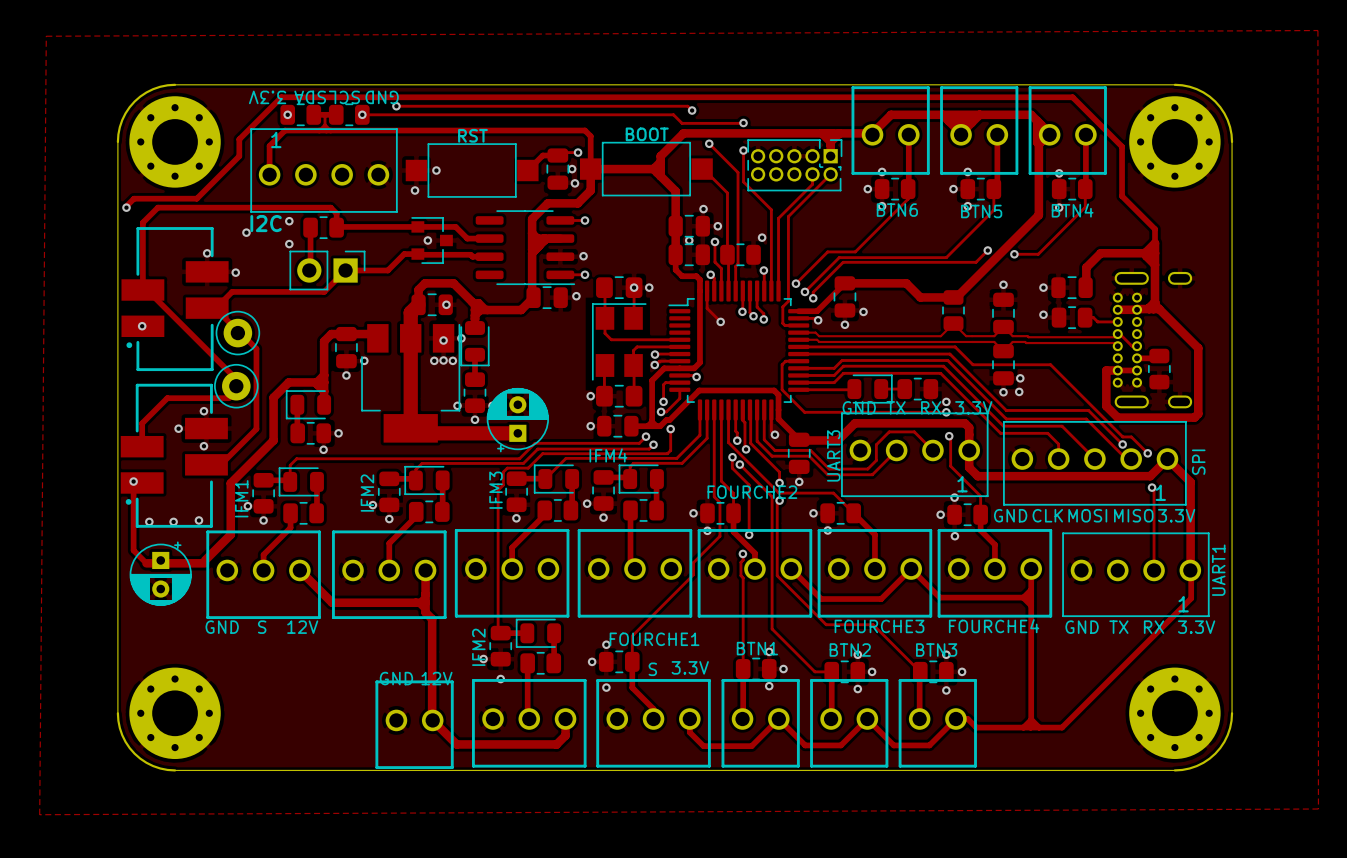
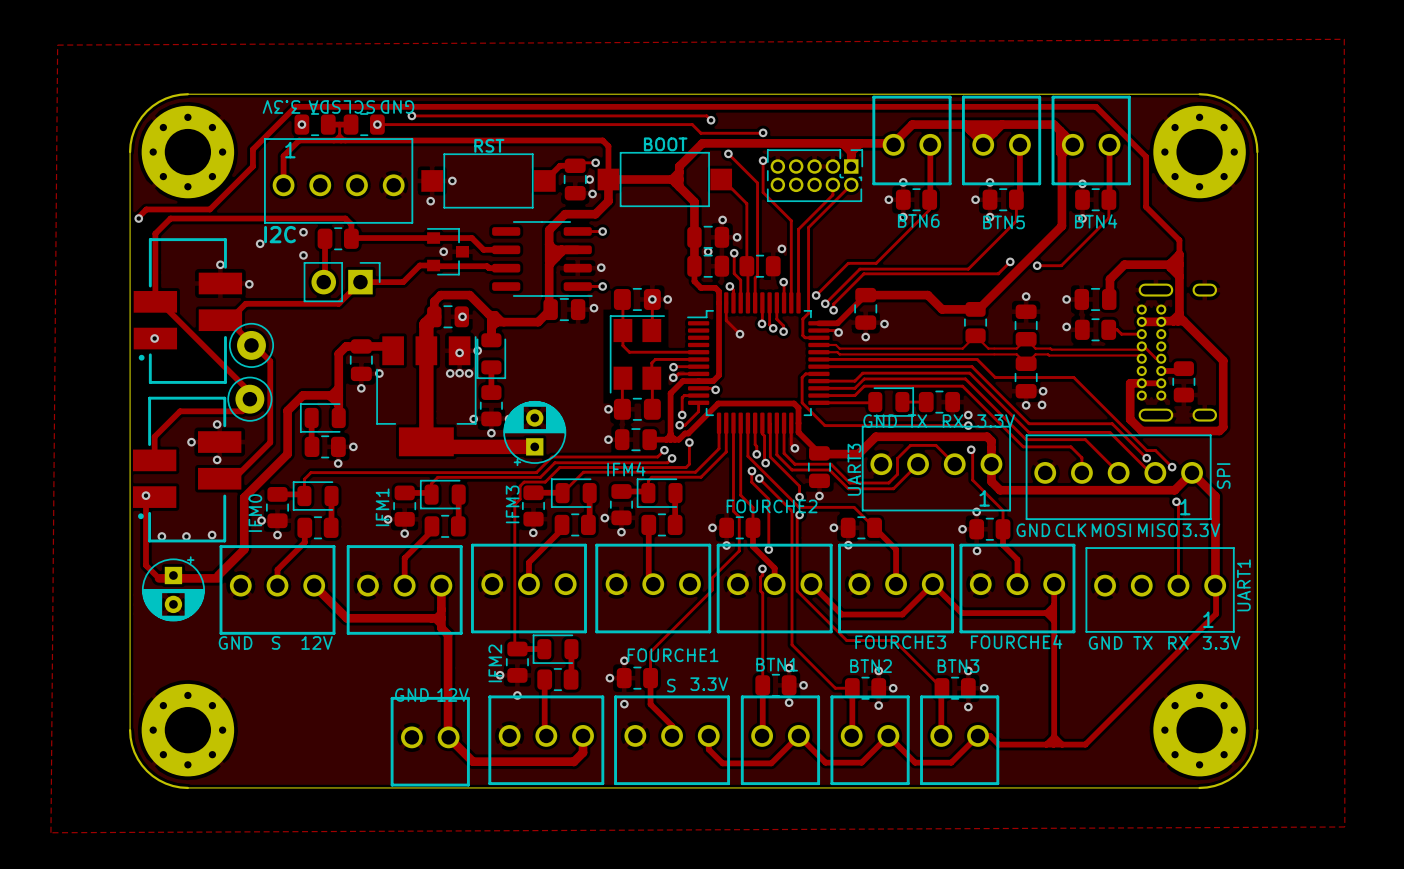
text: IFM2 (367, 493) -> IFM1 (382, 507)
text: IFM1 (241, 498) -> IFM0 (255, 513)

